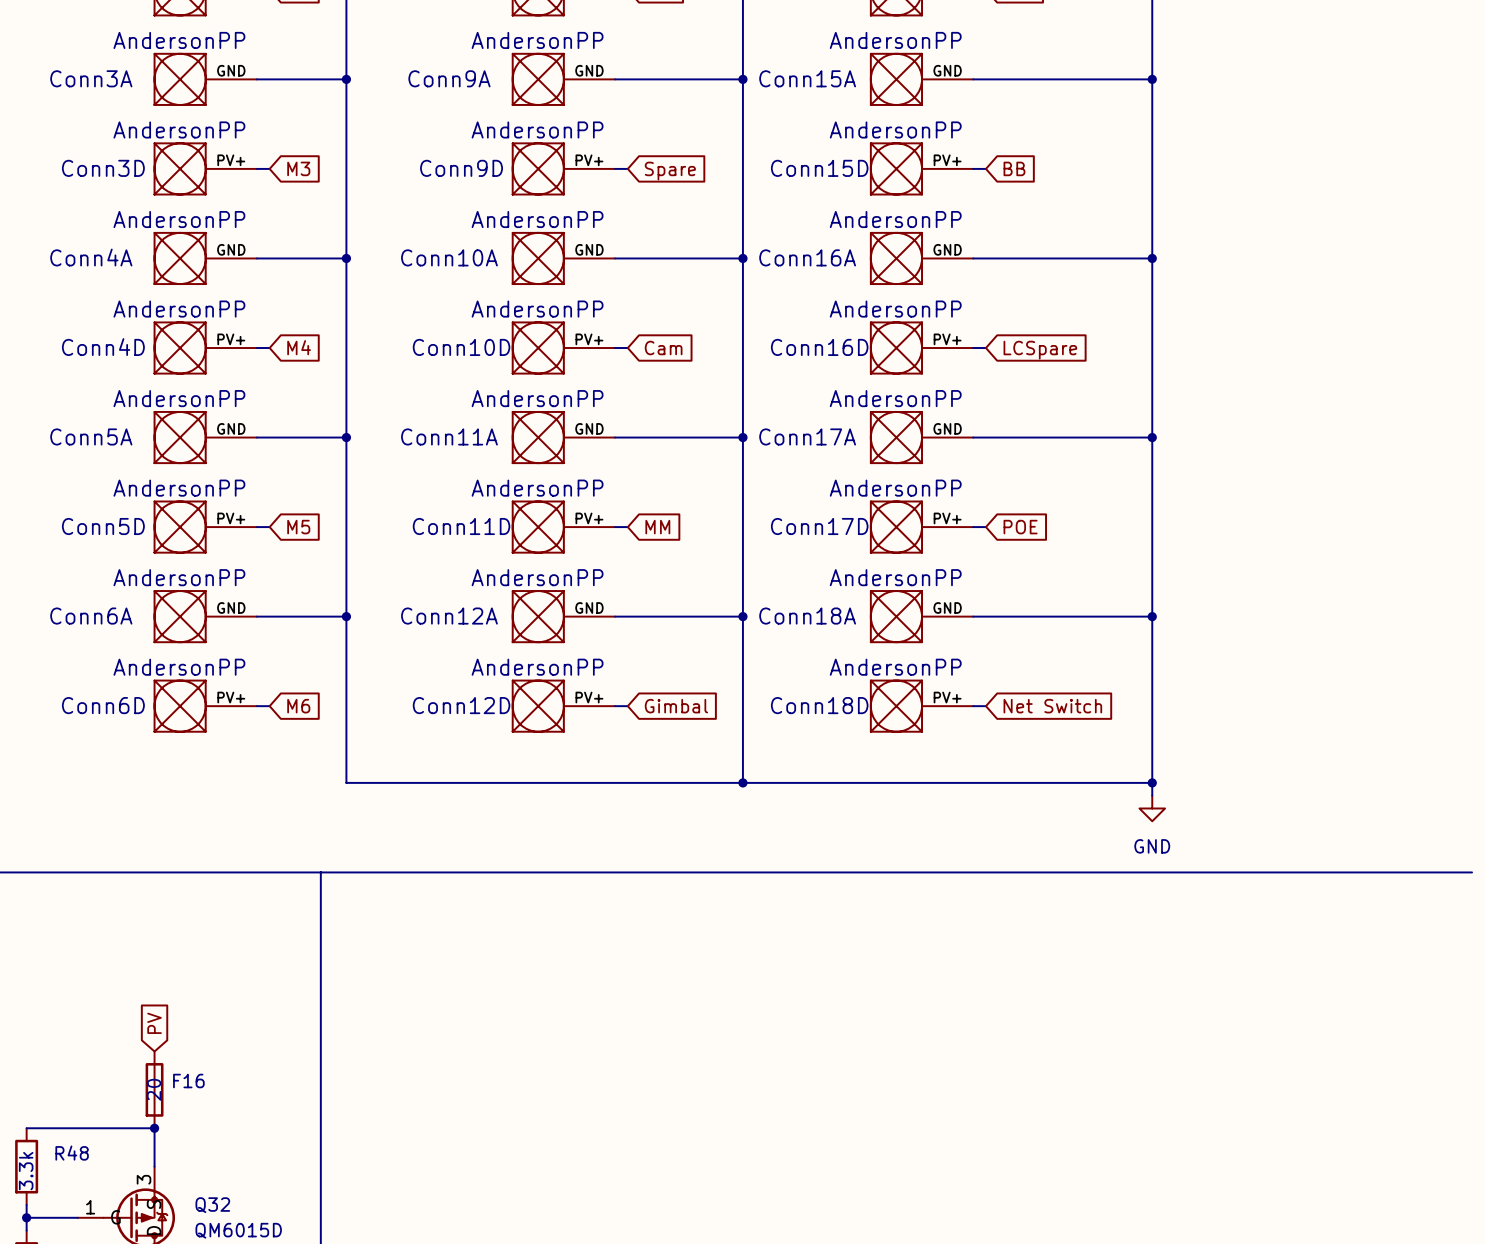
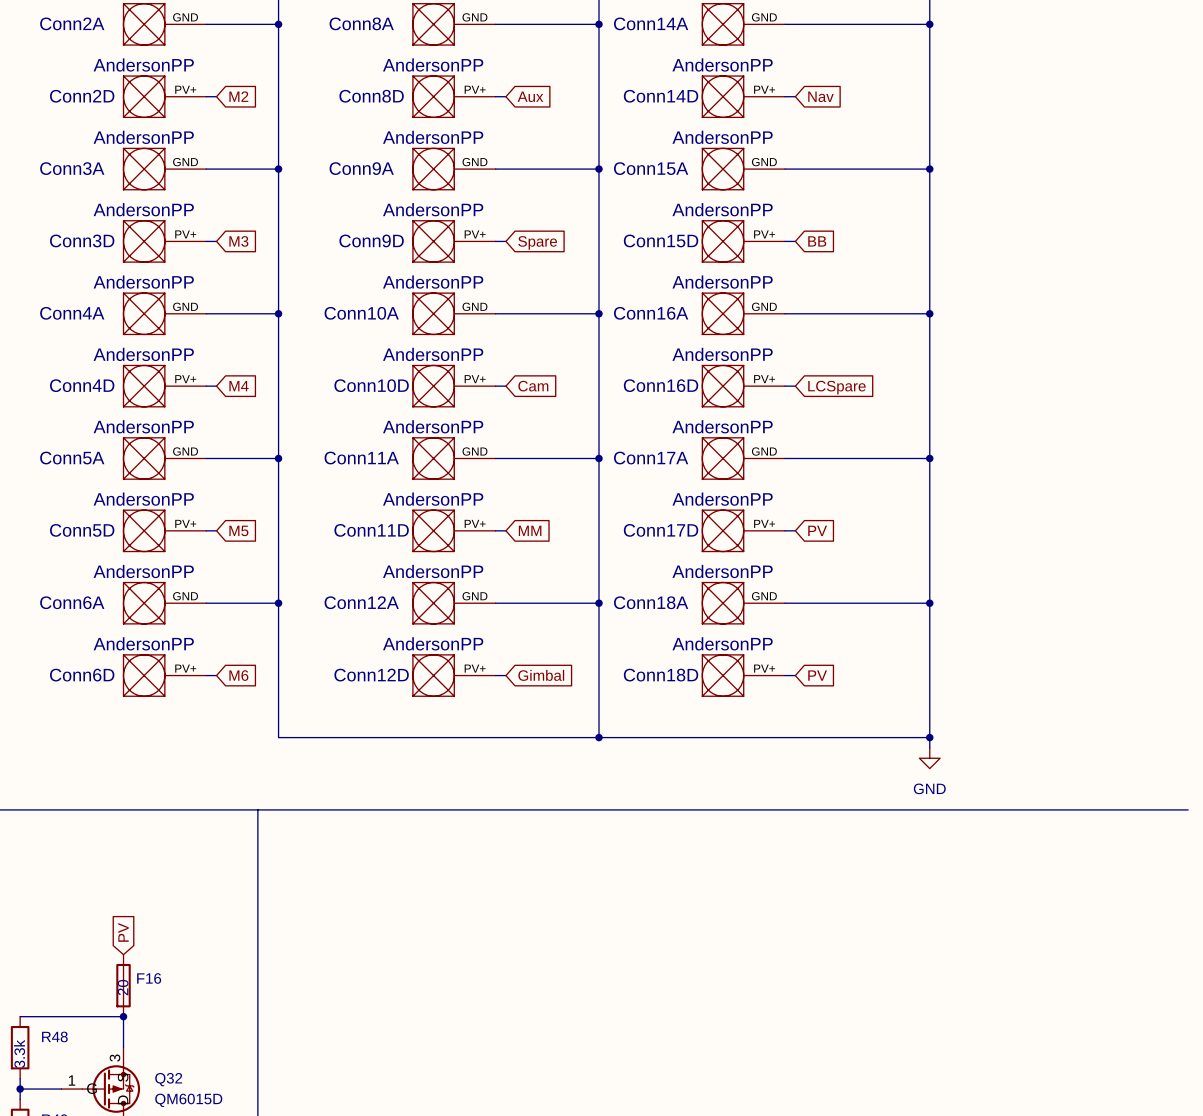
global label: POE (1020, 527) -> PV (817, 530)
global label: Net Switch (1052, 706) -> PV (817, 675)

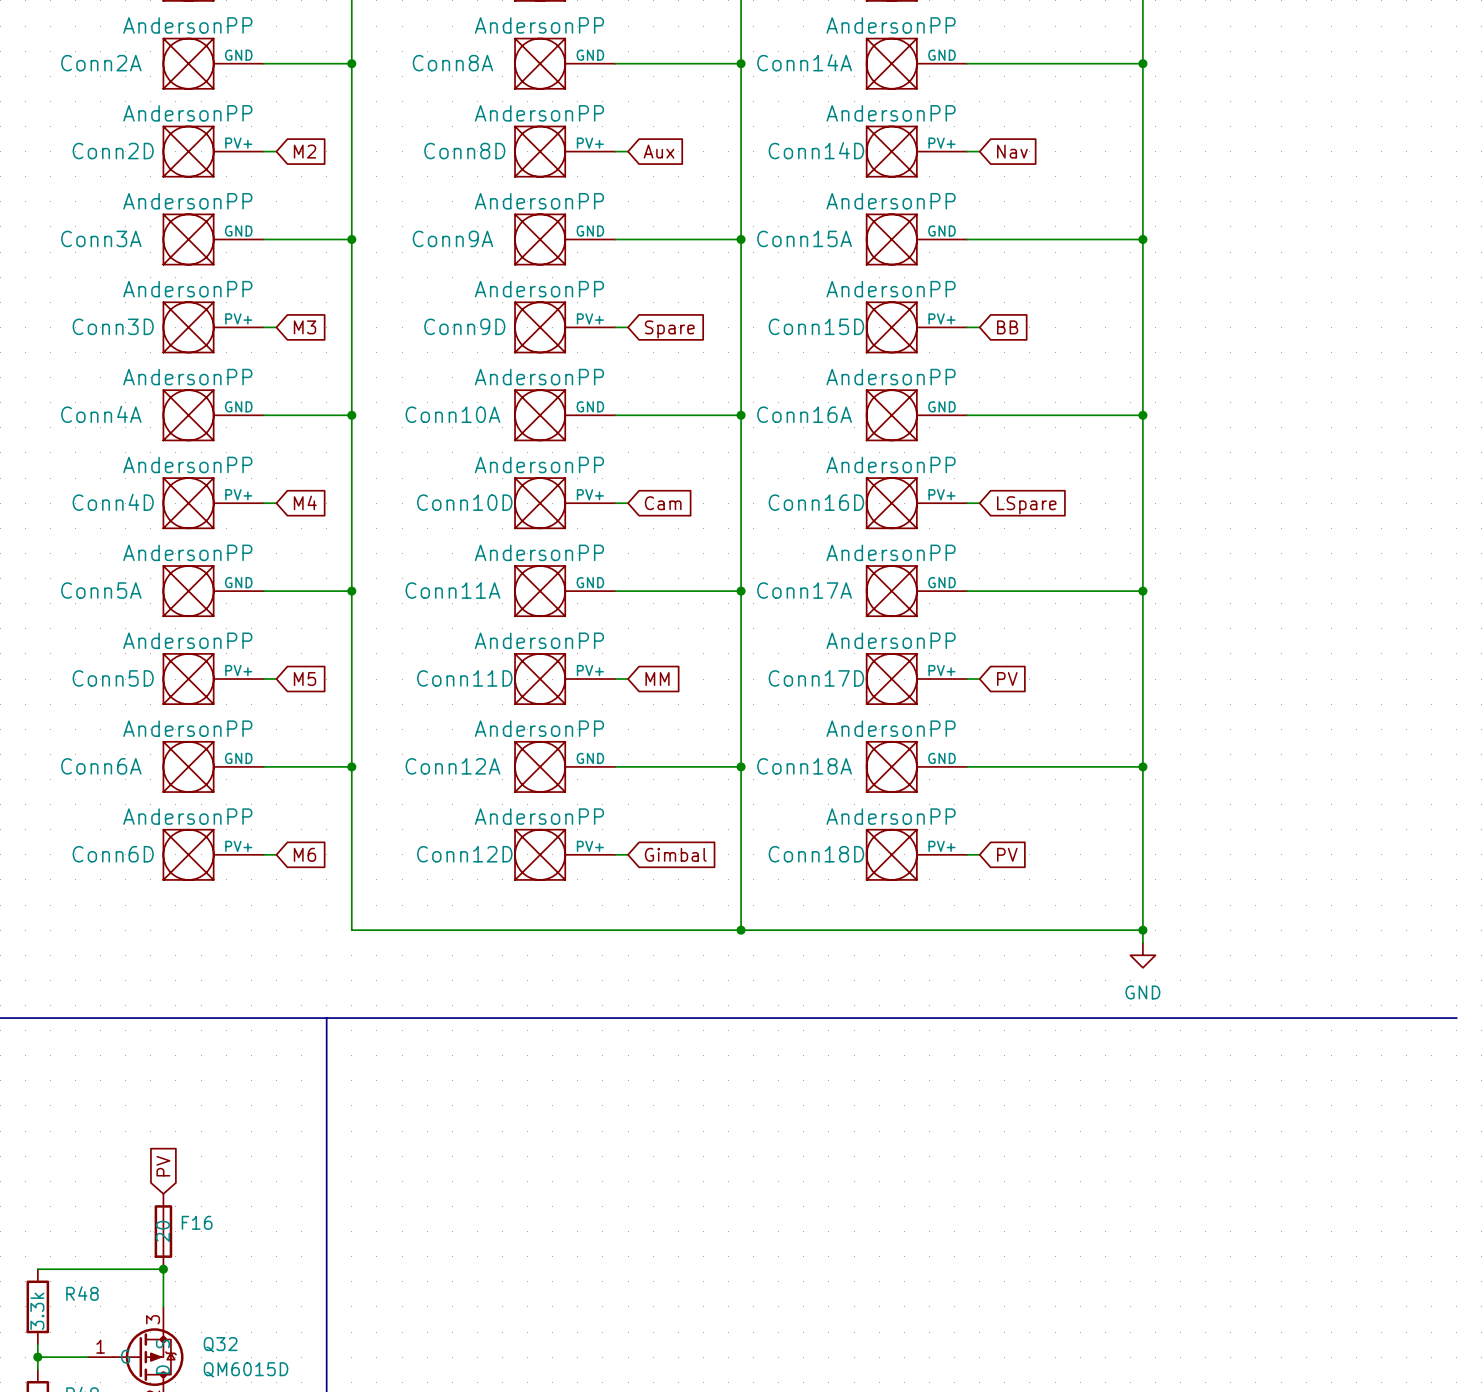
global label: LCSpare (836, 387) -> LSpare (1026, 505)

